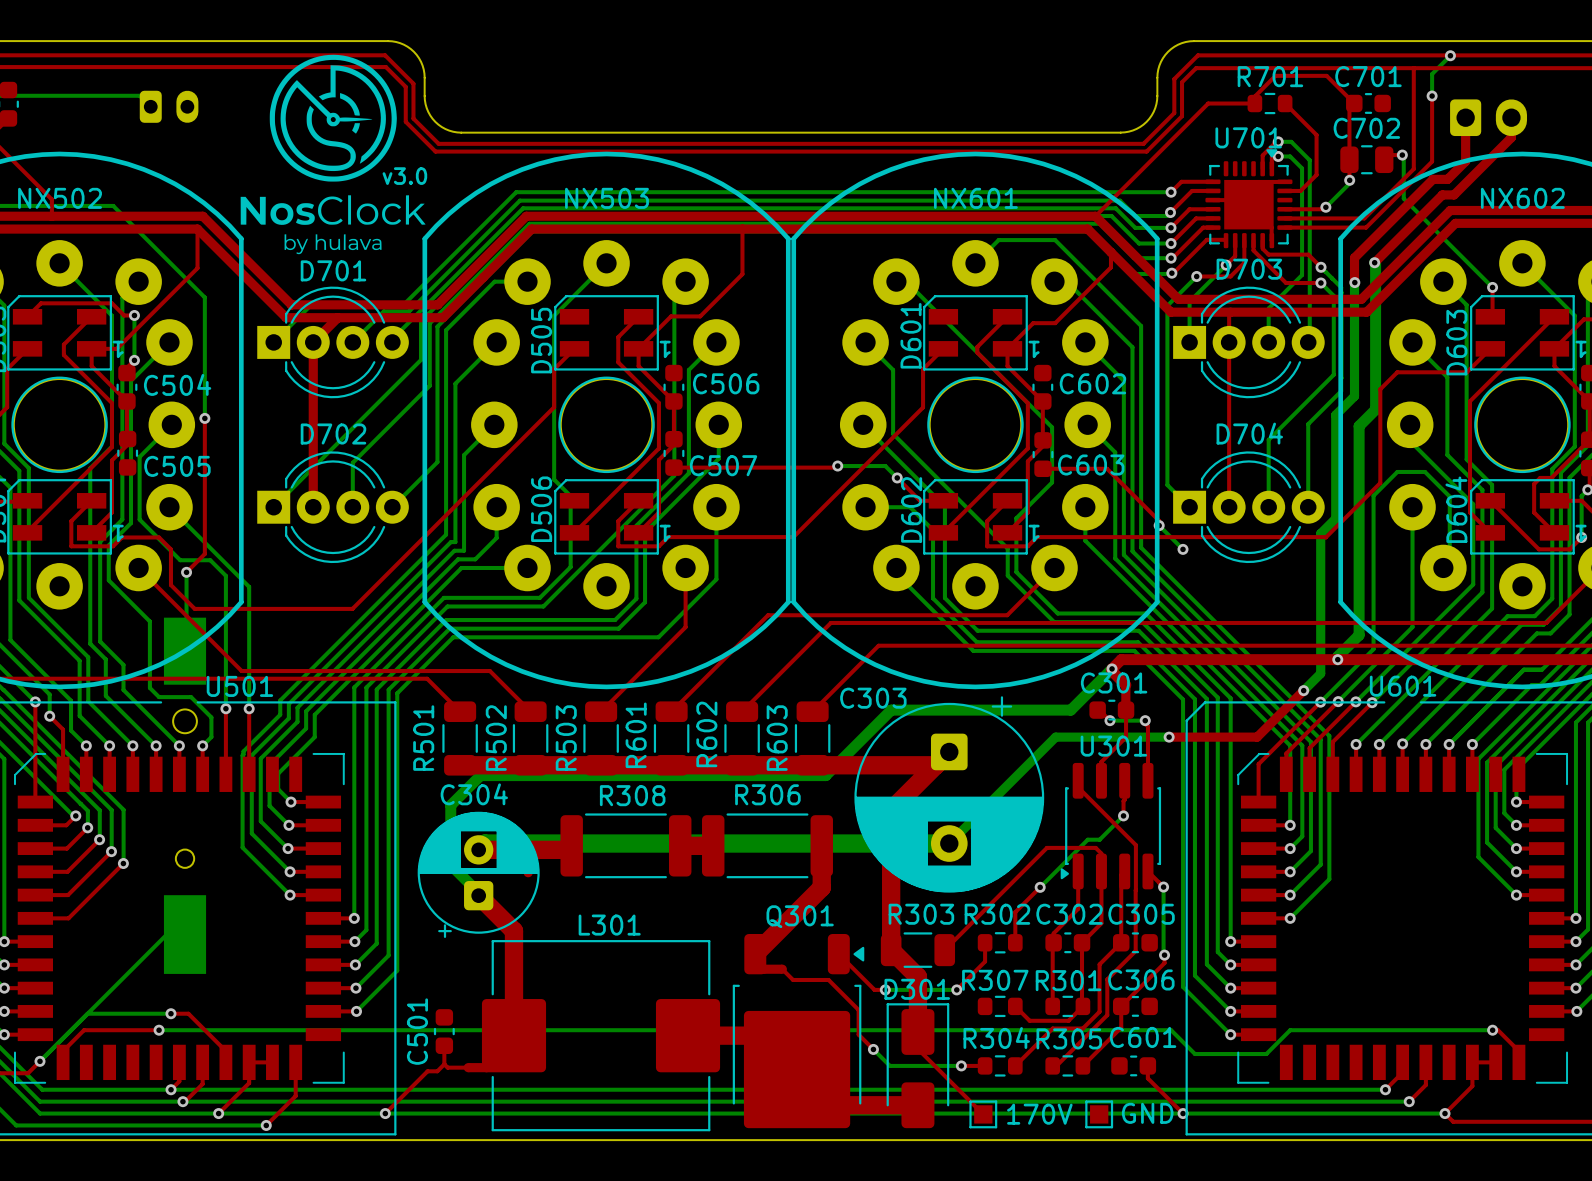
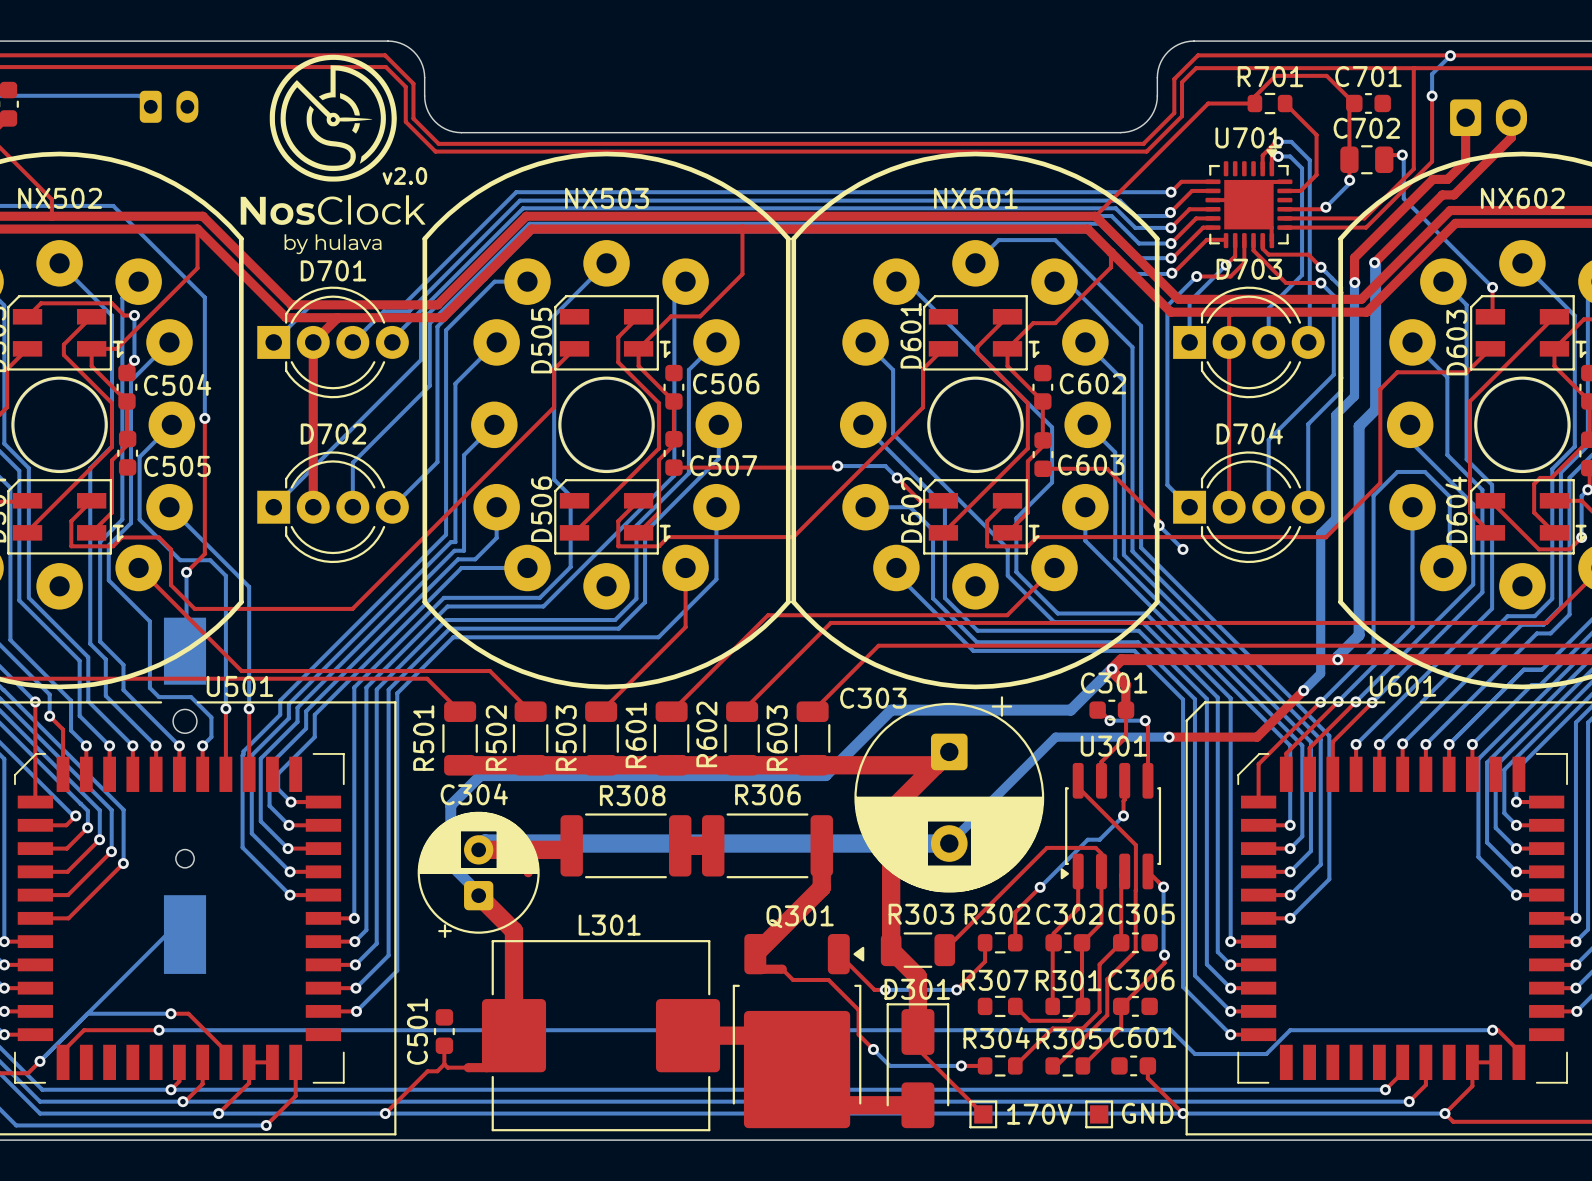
text: v3.0 (404, 176) -> v2.0 (404, 176)

